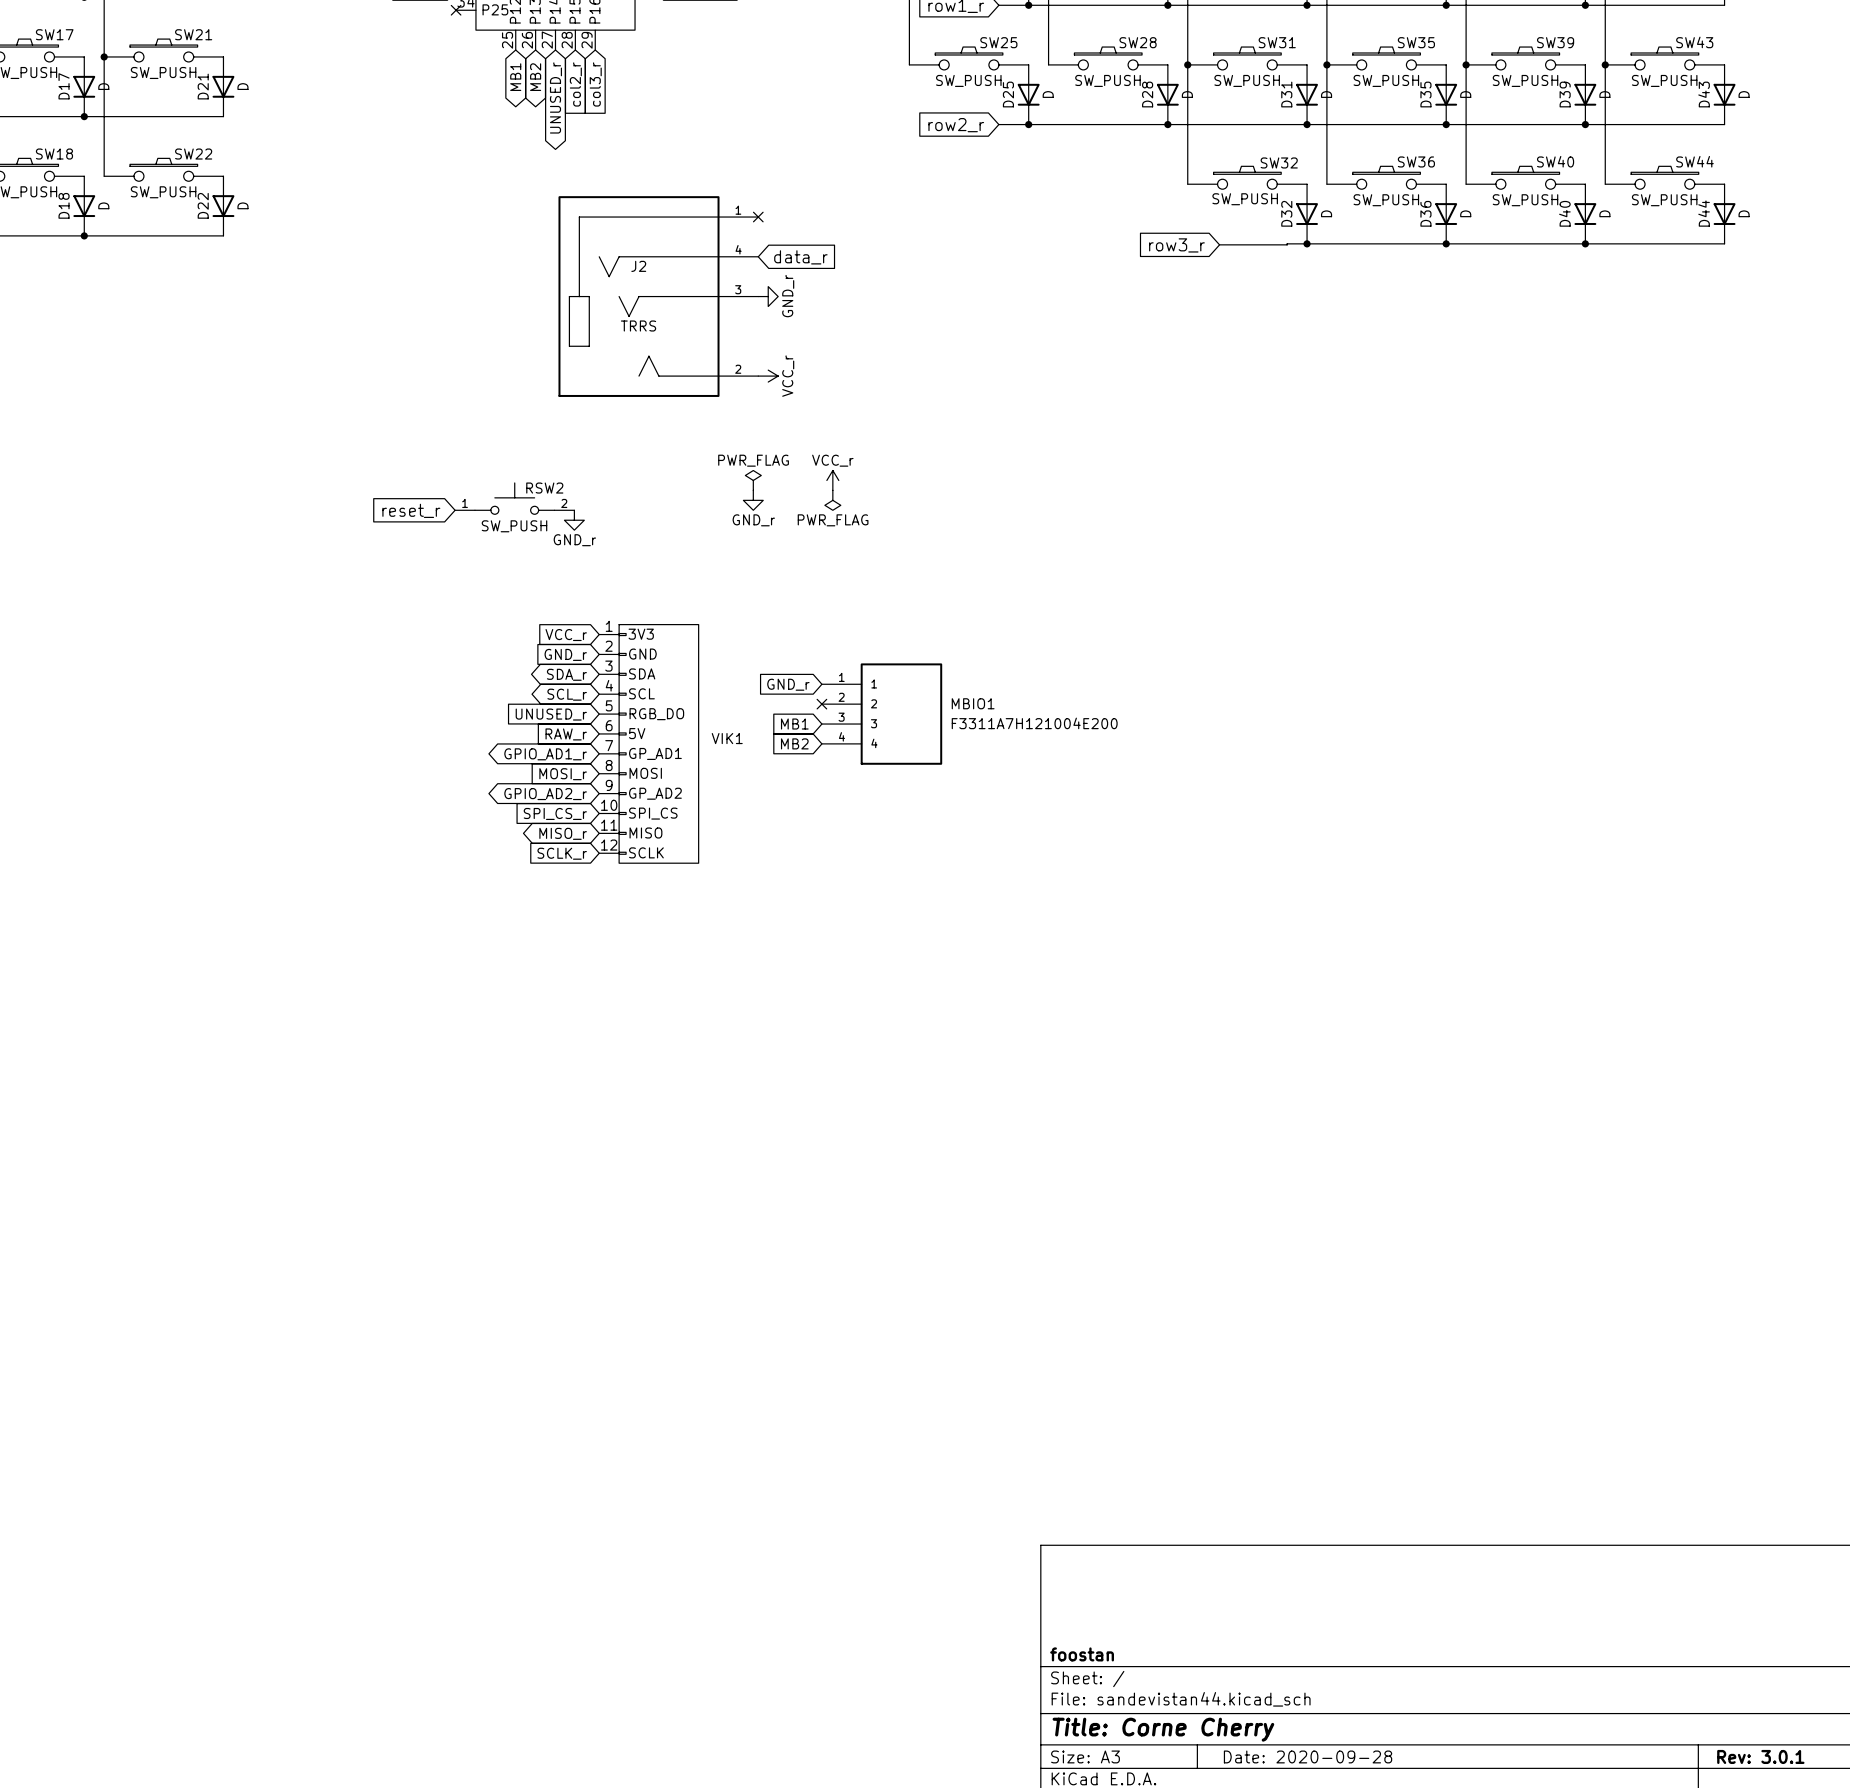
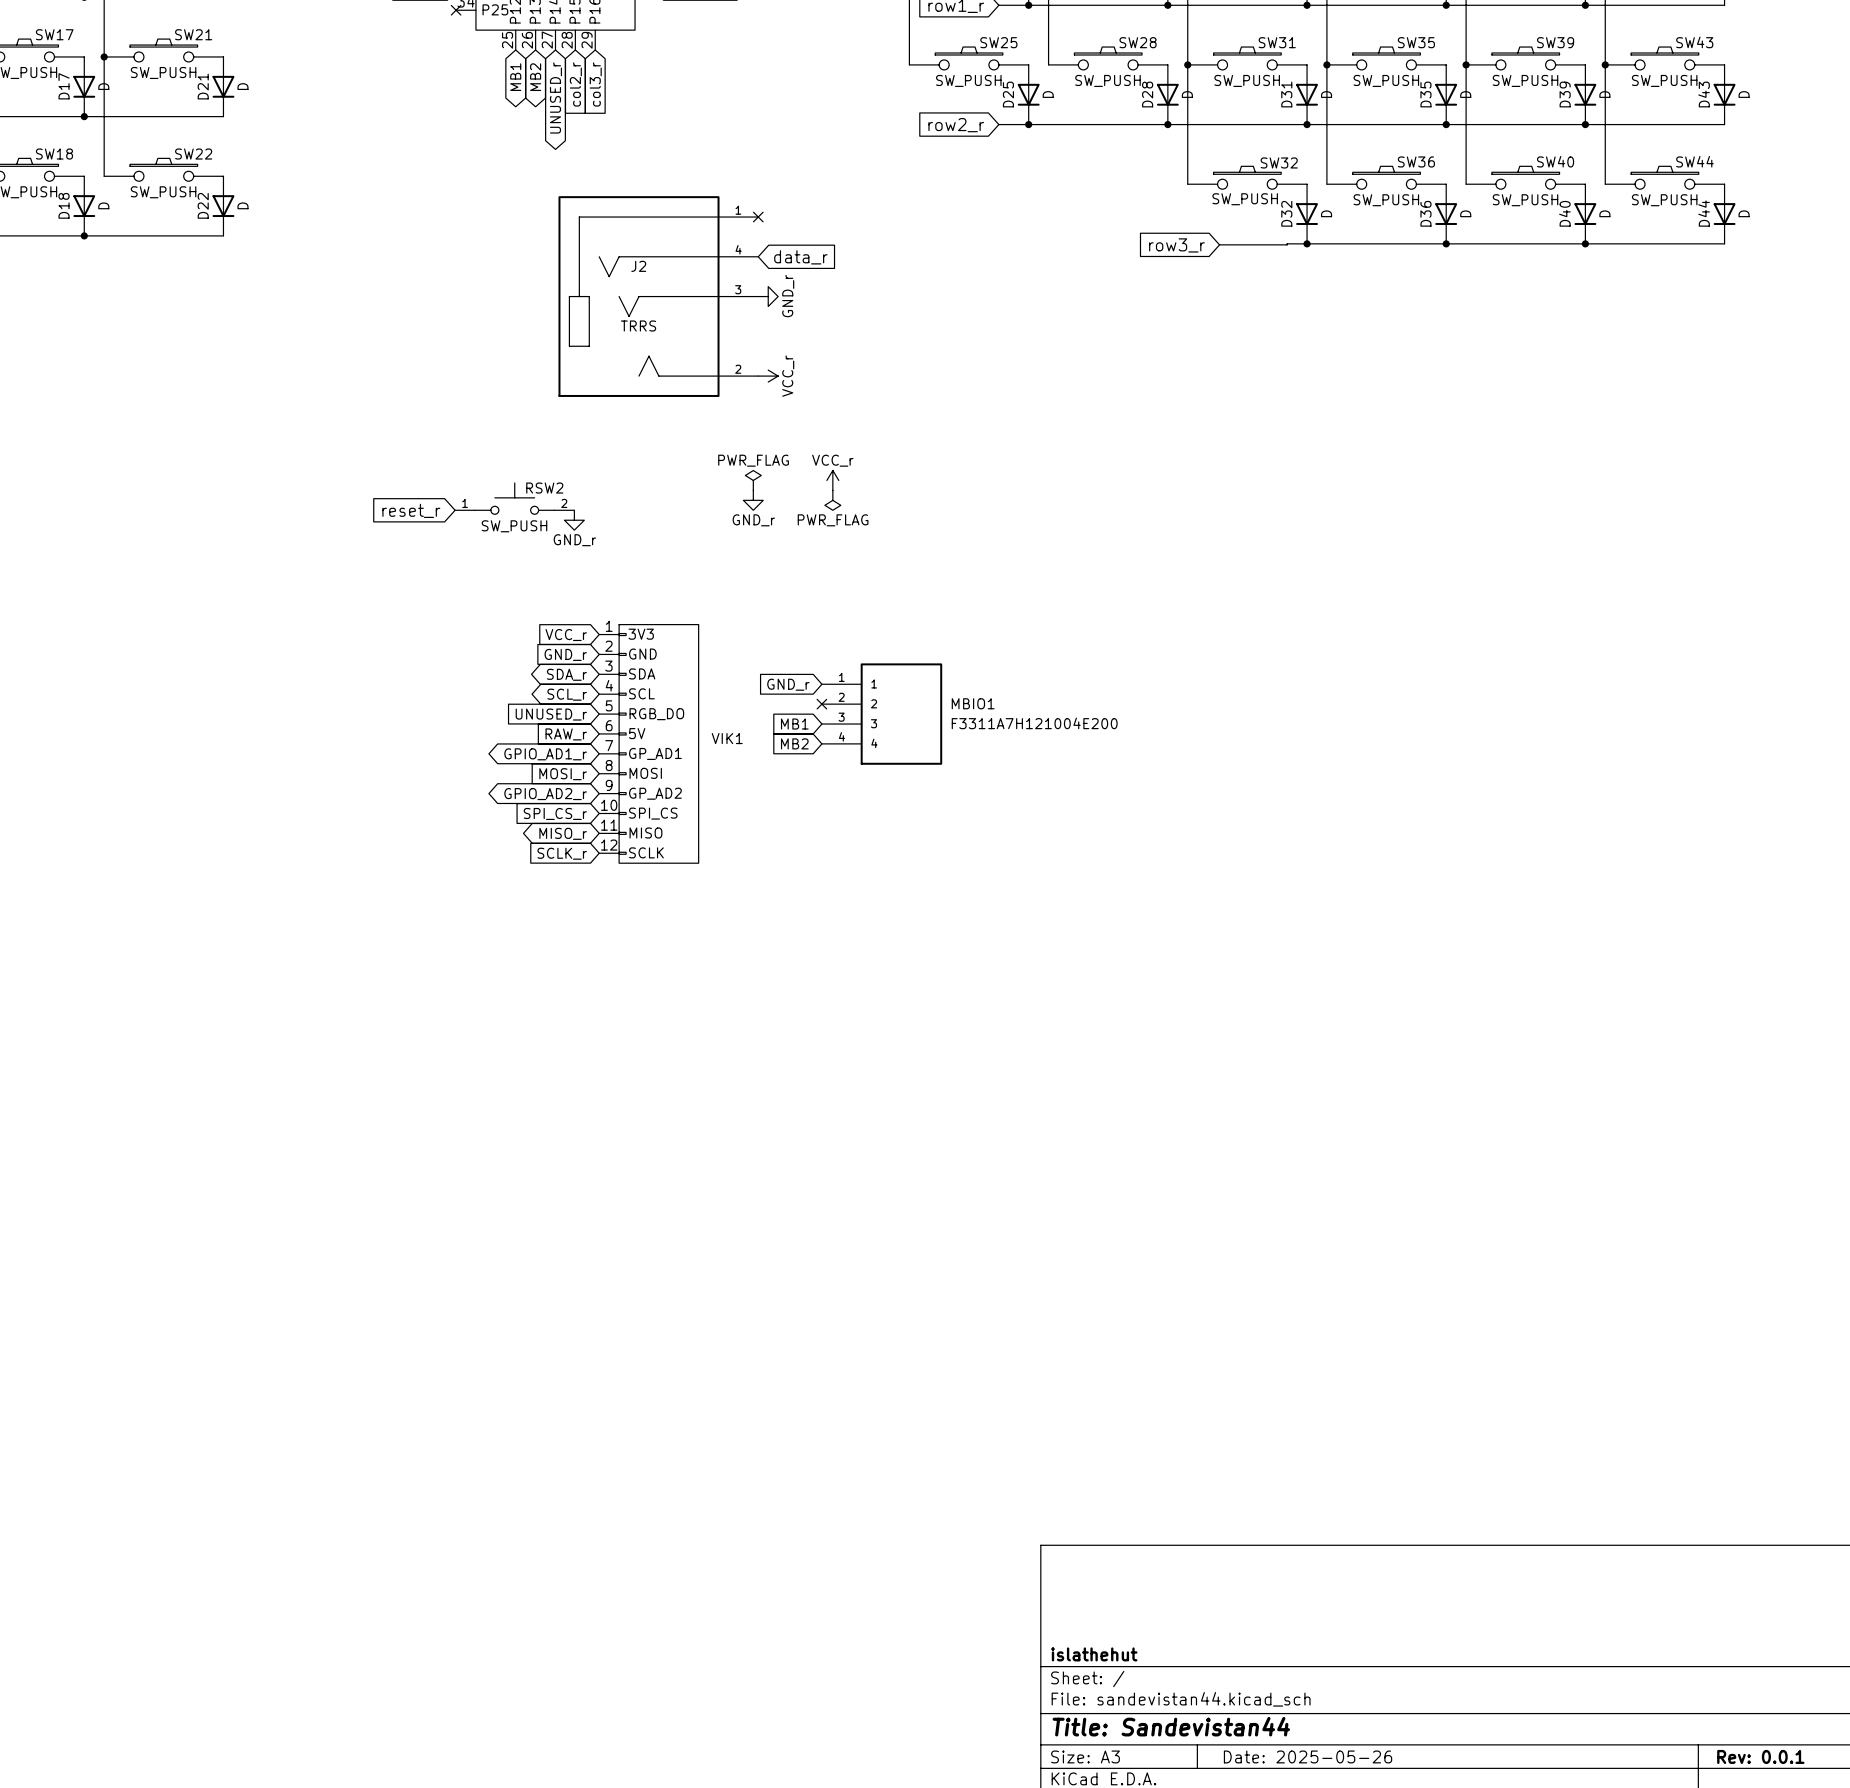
title block: foostan (1082, 1654) -> islathehut (1094, 1654)
title block: Title: Corne Cherry (1163, 1729) -> Title: Sandevistan44 (1171, 1726)
title block: Date: 2020-09-28 (1308, 1756) -> Date: 2025-05-26 (1308, 1756)
title block: Rev: 3.0.1 (1760, 1756) -> Rev: 0.0.1 (1760, 1756)

